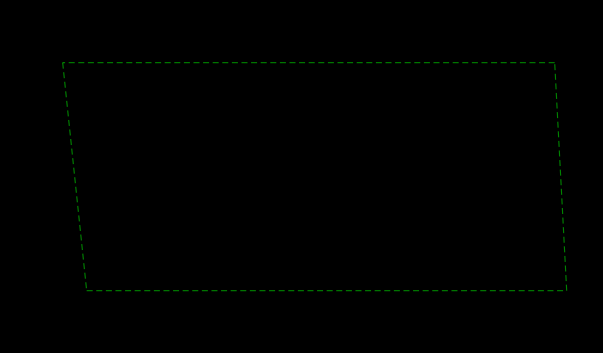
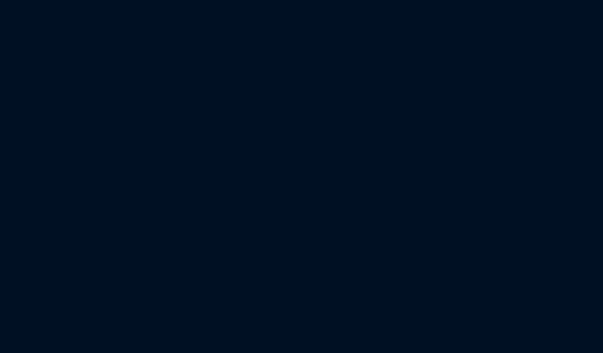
bottom zone outline: (62, 62) (554, 62) (566, 290) (86, 290) (62, 62) -> none

